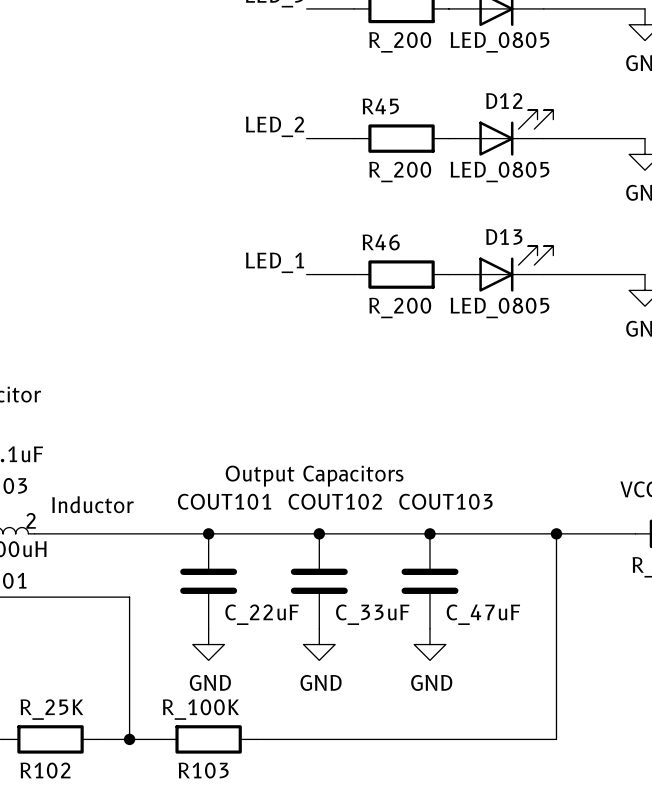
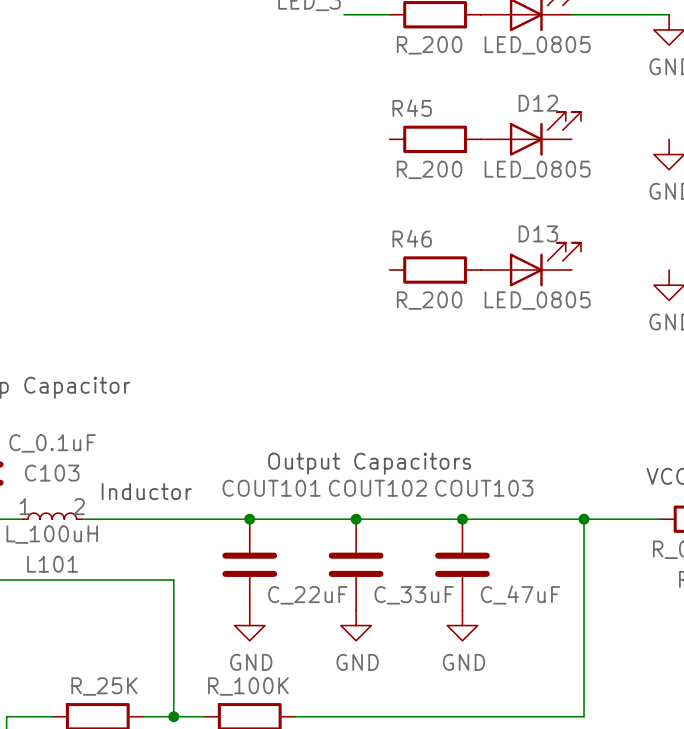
label: LED_2 (275, 126) -> none
wire: (306, 138) (354, 138) -> none
wire: (543, 138) (645, 138) -> none
label: LED_1 (274, 262) -> none
wire: (306, 274) (354, 274) -> none
wire: (543, 274) (645, 274) -> none

